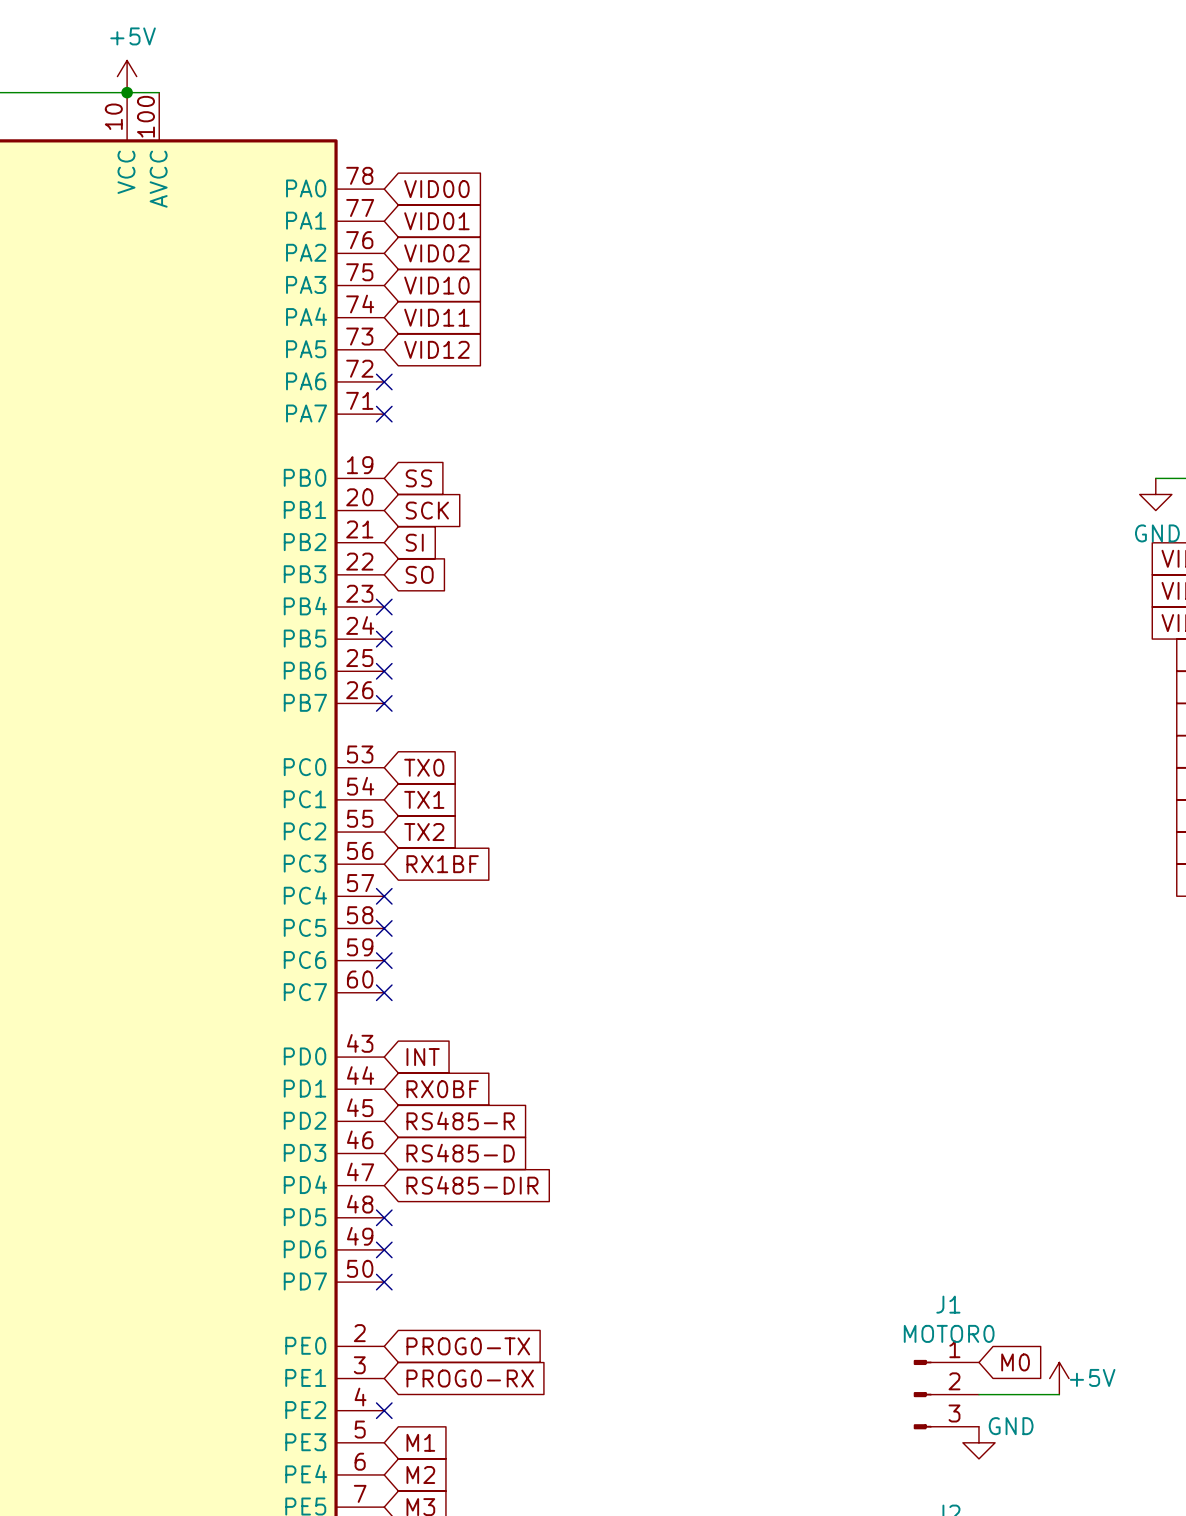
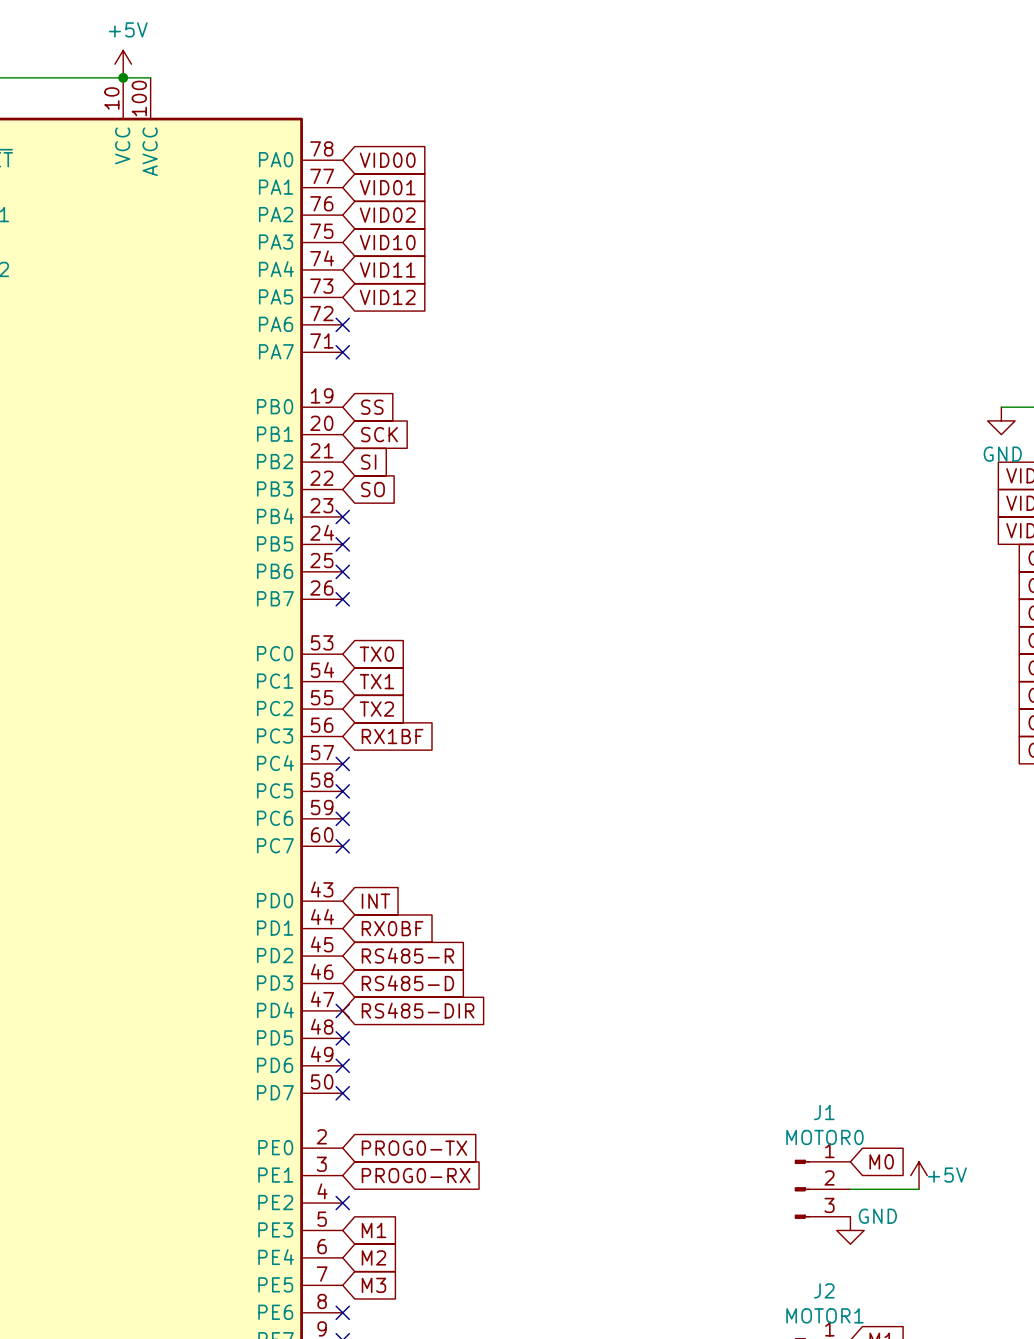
no-connect mark: none -> (342, 1010)

